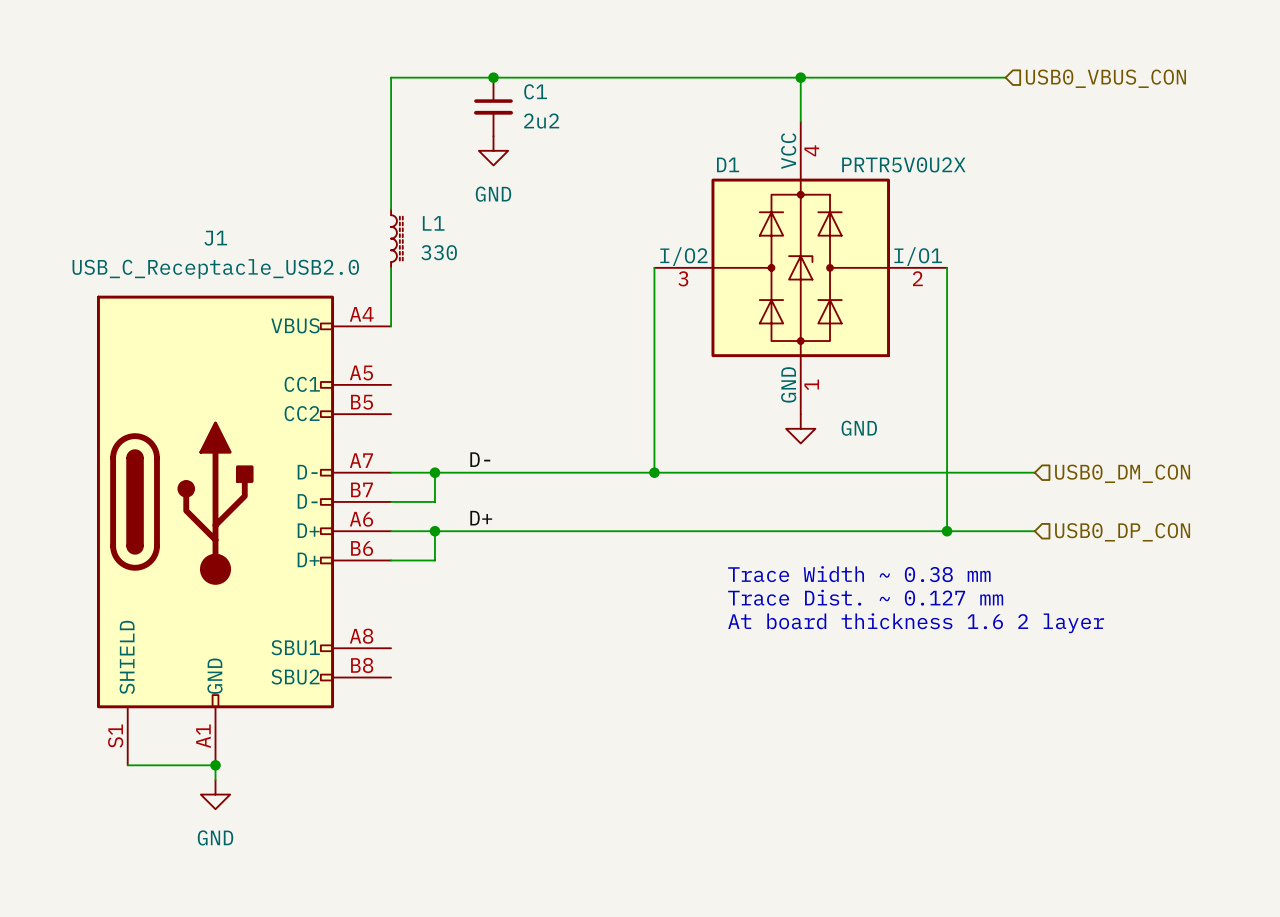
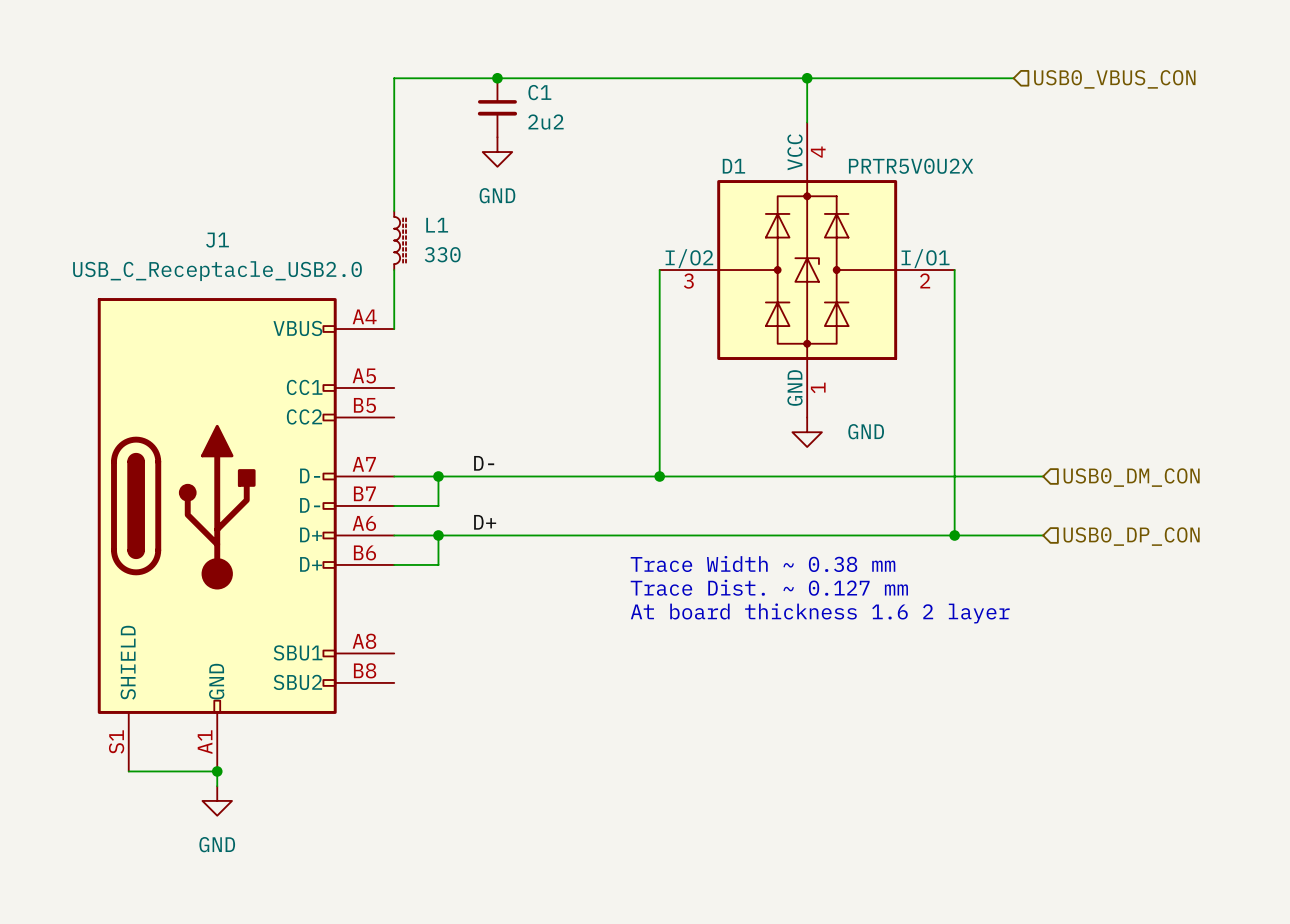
text position: Trace Width ~ 0.38 mm (859, 574) -> Trace Width ~ 0.38 mm (763, 564)
text position: Trace Dist. ~ 0.127 mm (865, 597) -> Trace Dist. ~ 0.127 mm (769, 587)
text position: At board thickness 1.6 2 layer (916, 623) -> At board thickness 1.6 2 layer (820, 613)

